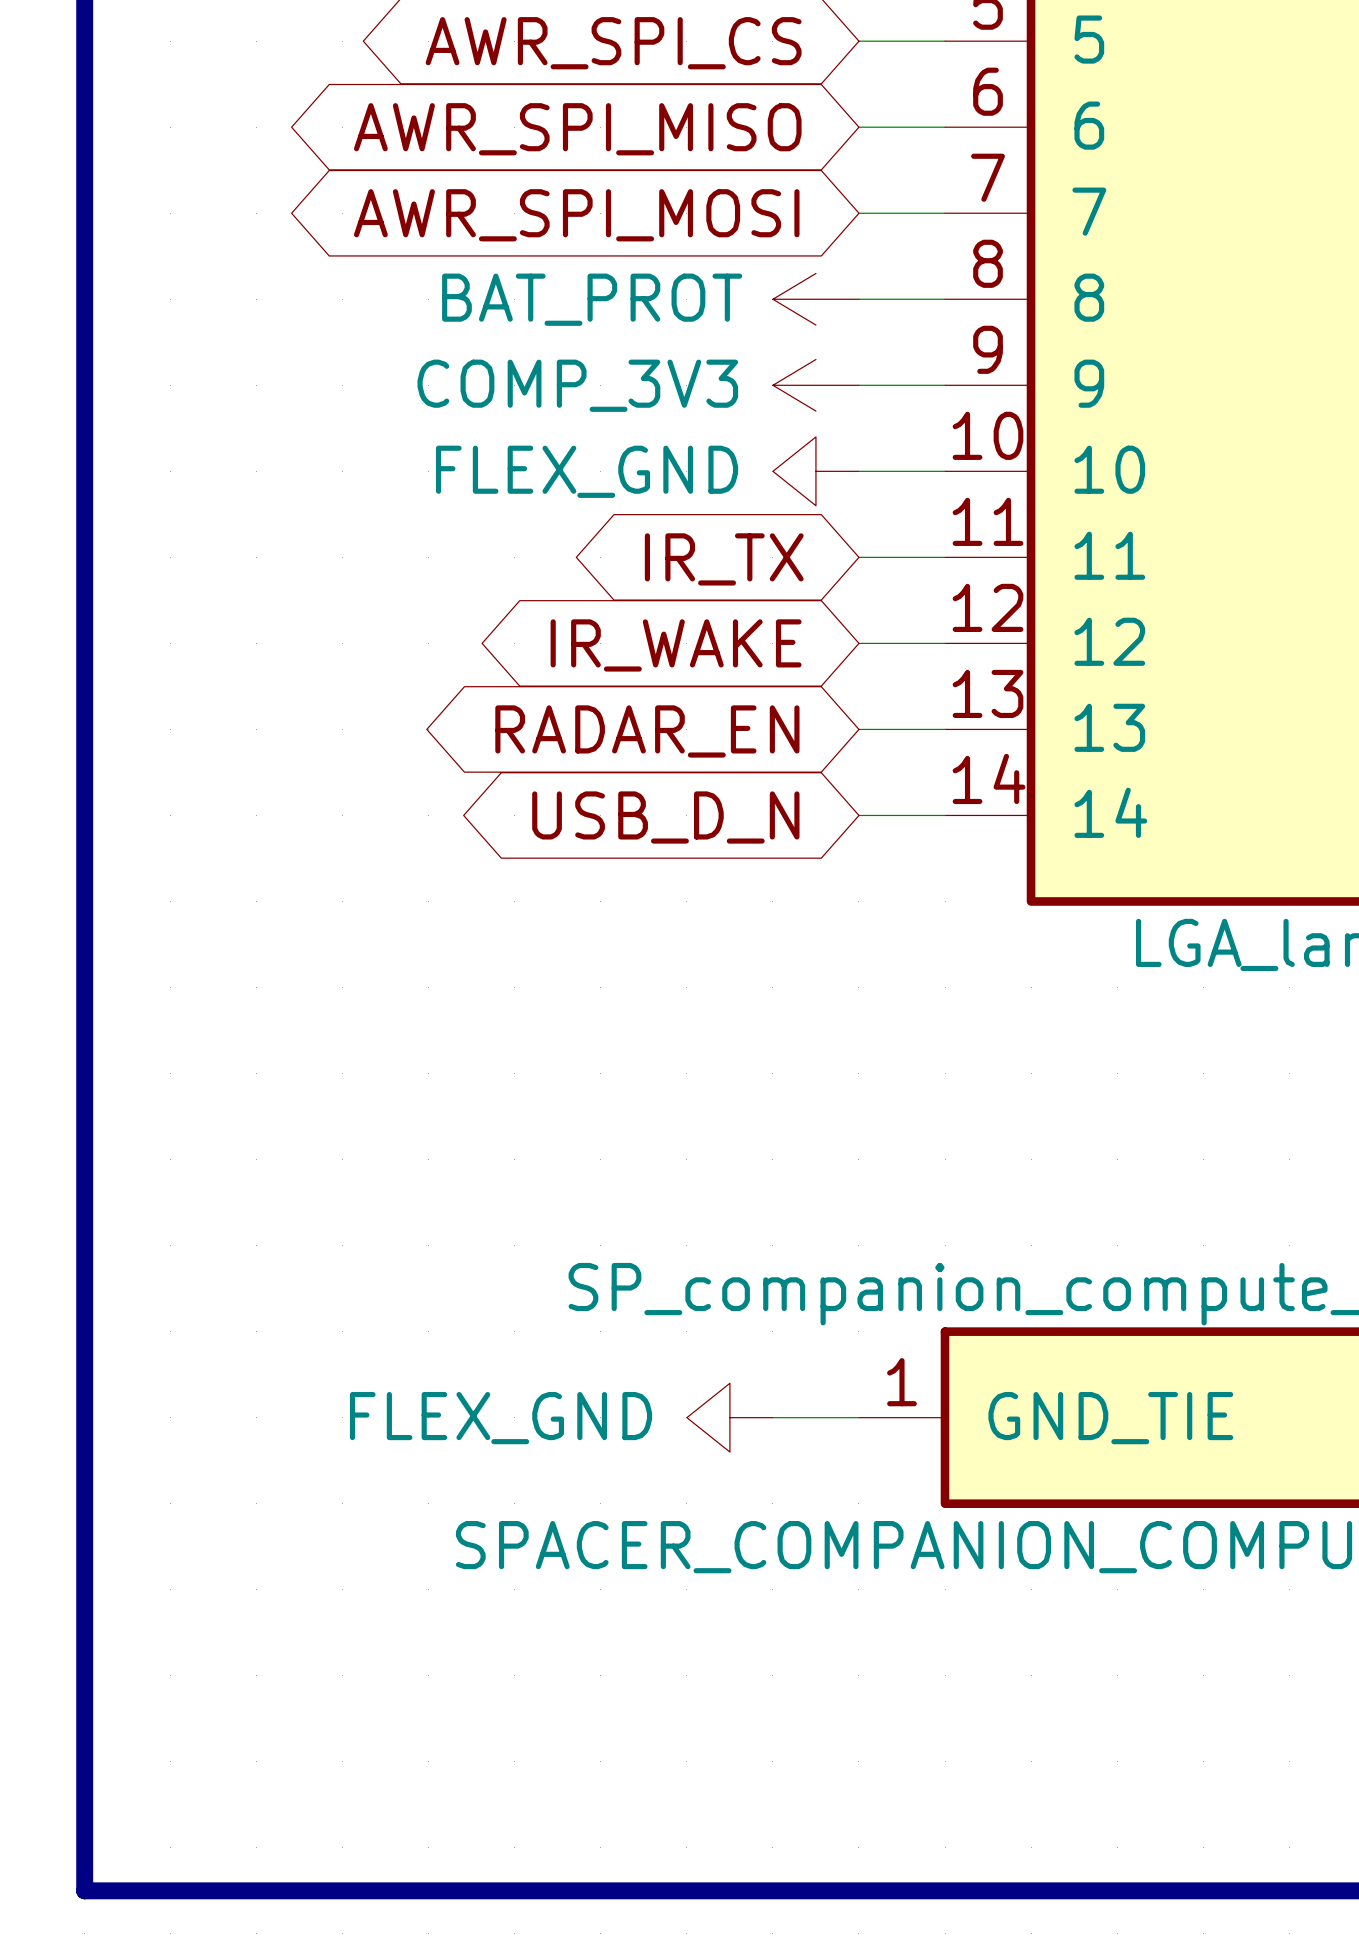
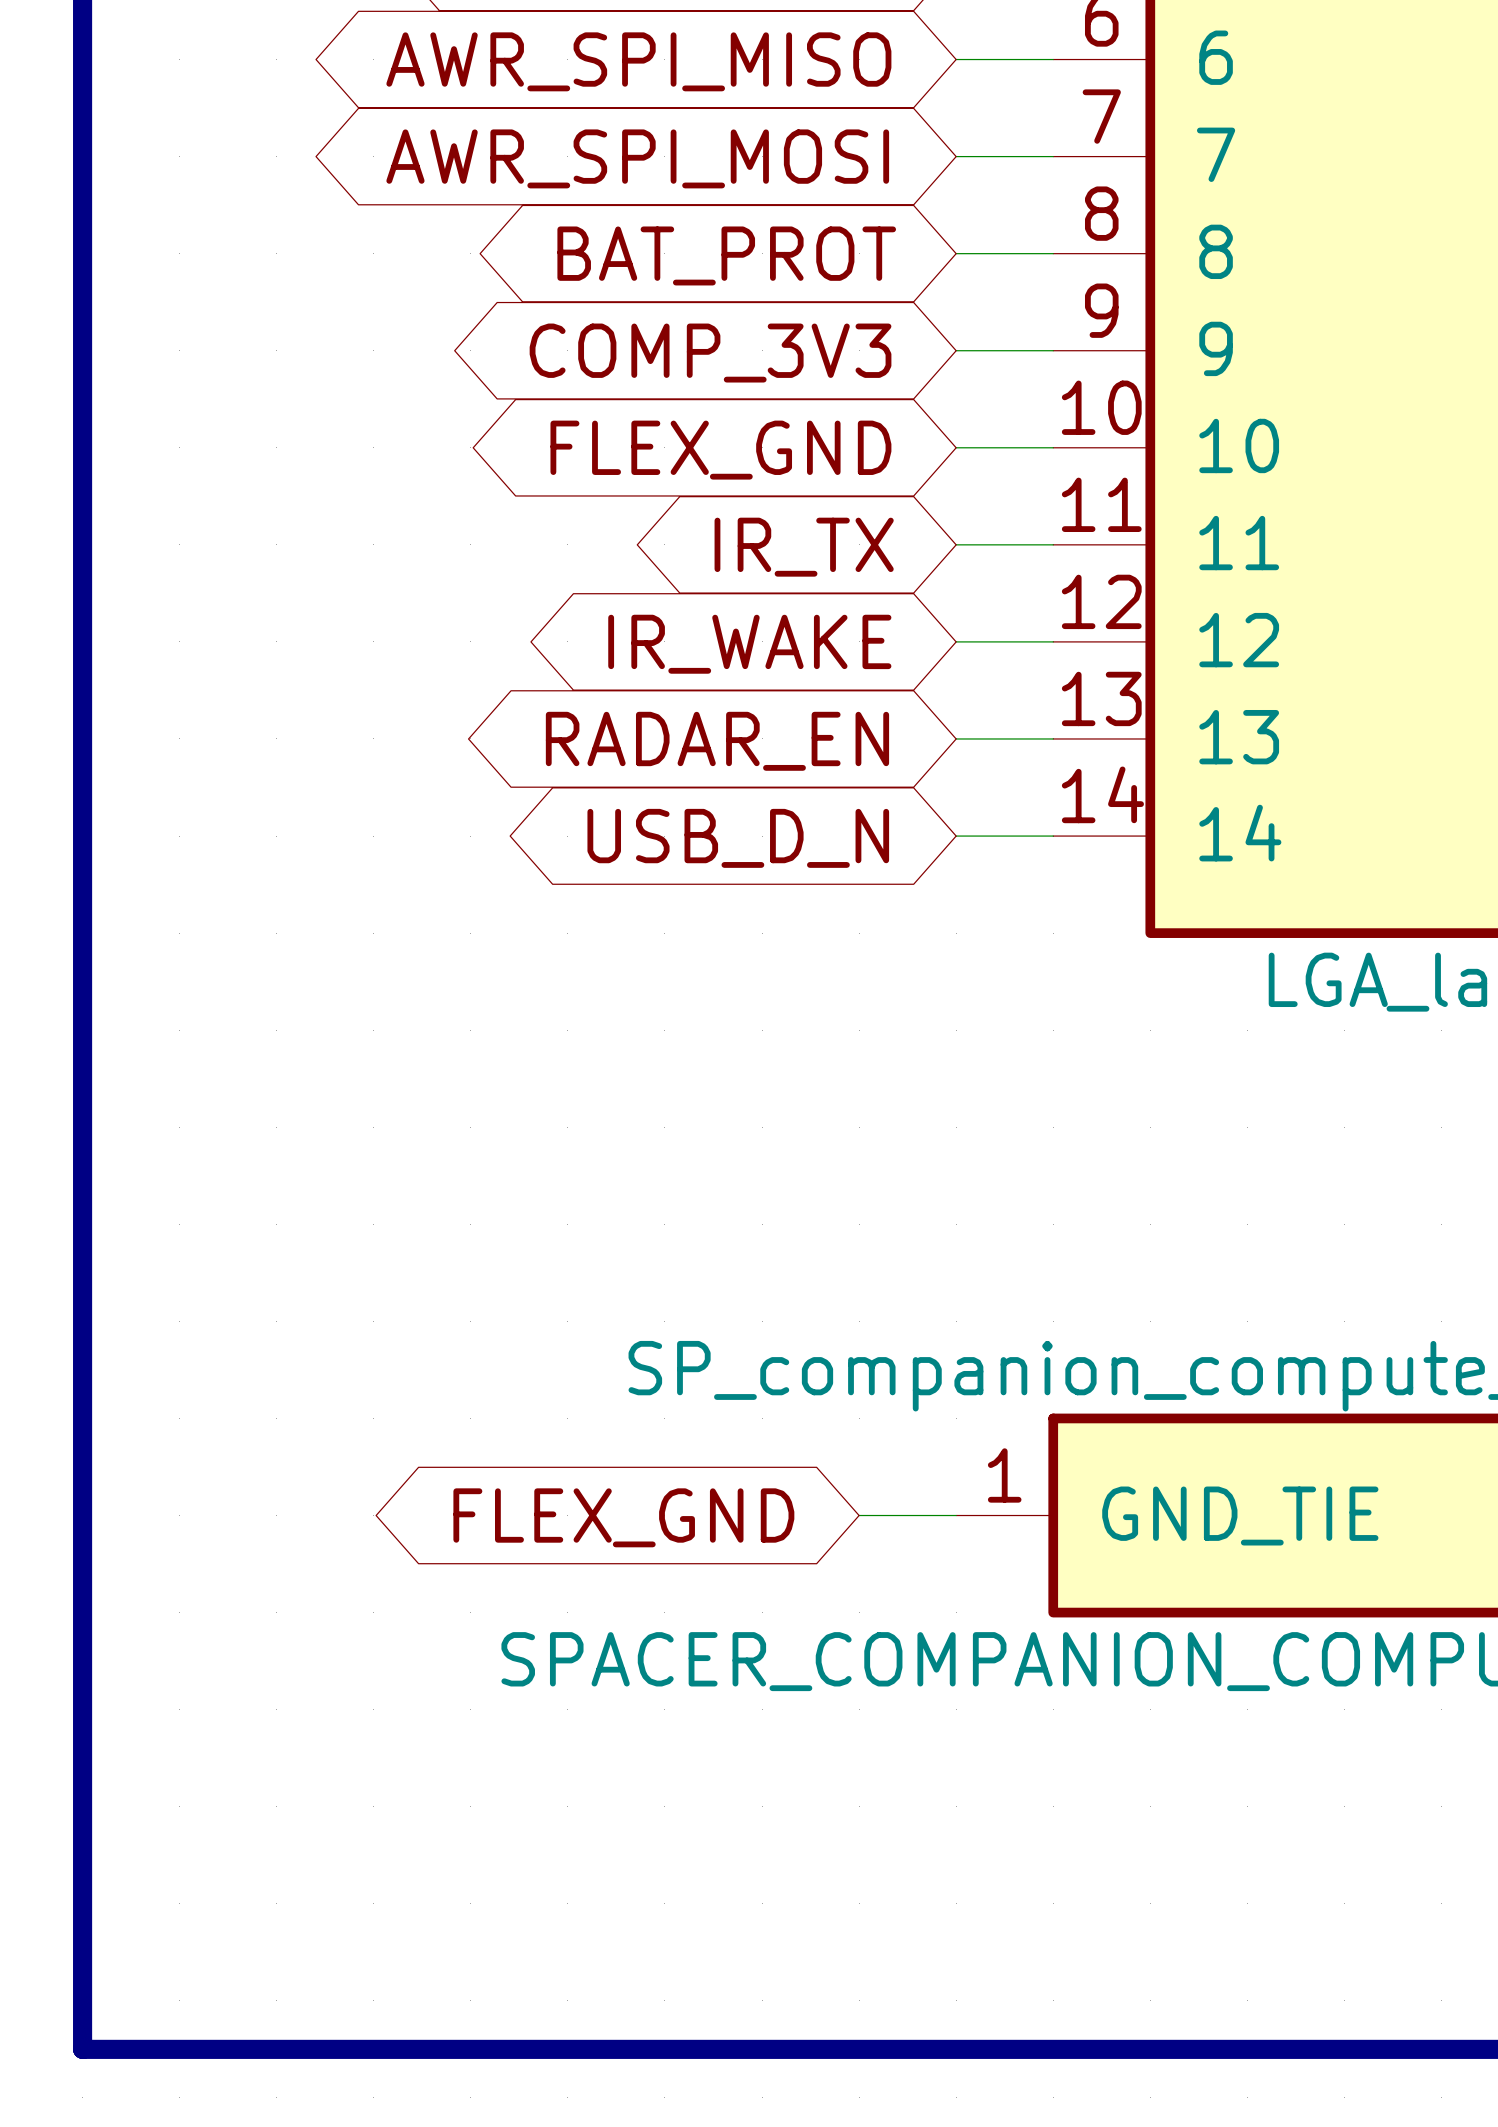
power symbol: BAT_PROT (815, 299) -> none
global label: none -> BAT_PROT (726, 255)
power symbol: COMP_3V3 (815, 385) -> none
global label: none -> COMP_3V3 (710, 353)
power symbol: FLEX_GND (815, 471) -> none
global label: none -> FLEX_GND (720, 450)
power symbol: FLEX_GND (729, 1417) -> none
global label: none -> FLEX_GND (623, 1517)

